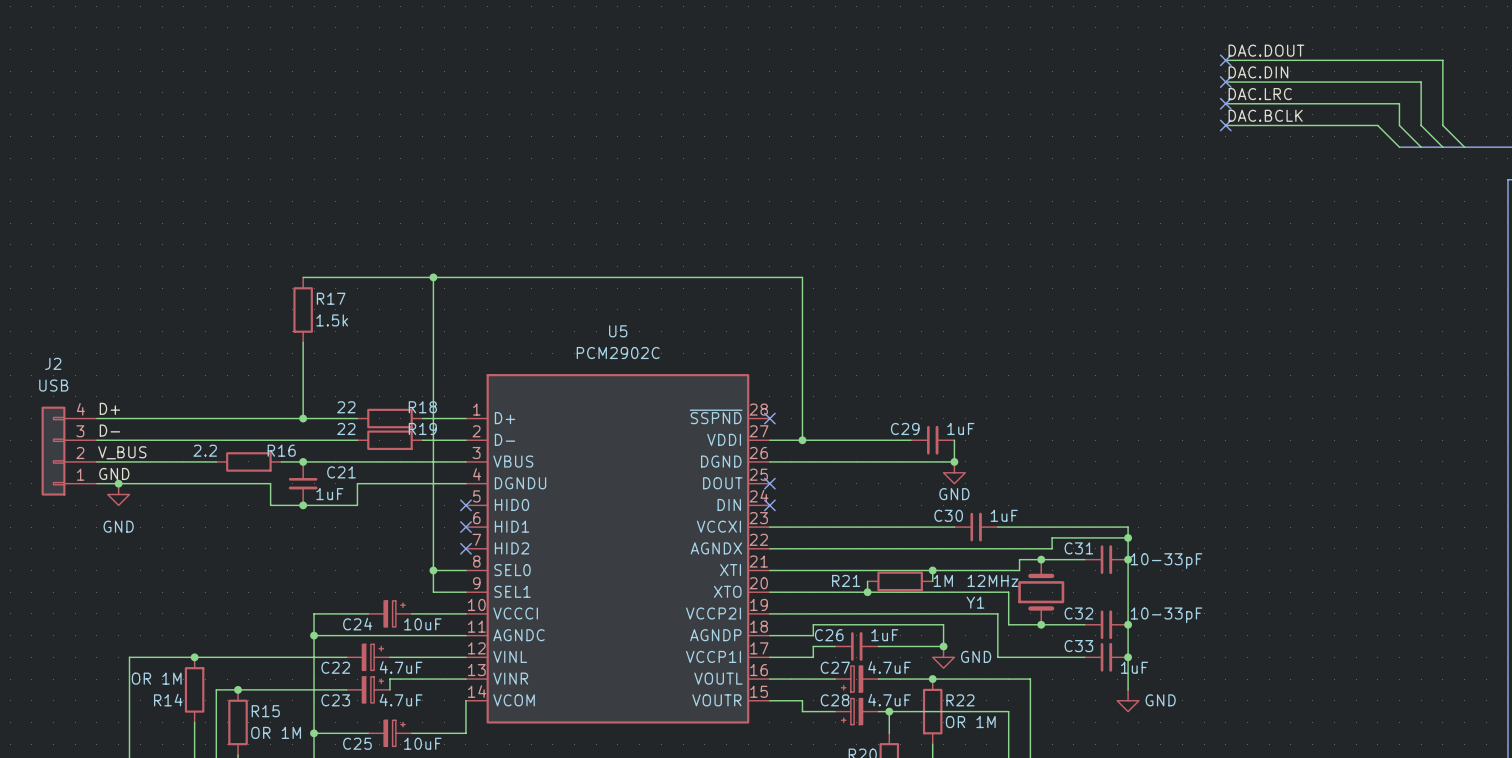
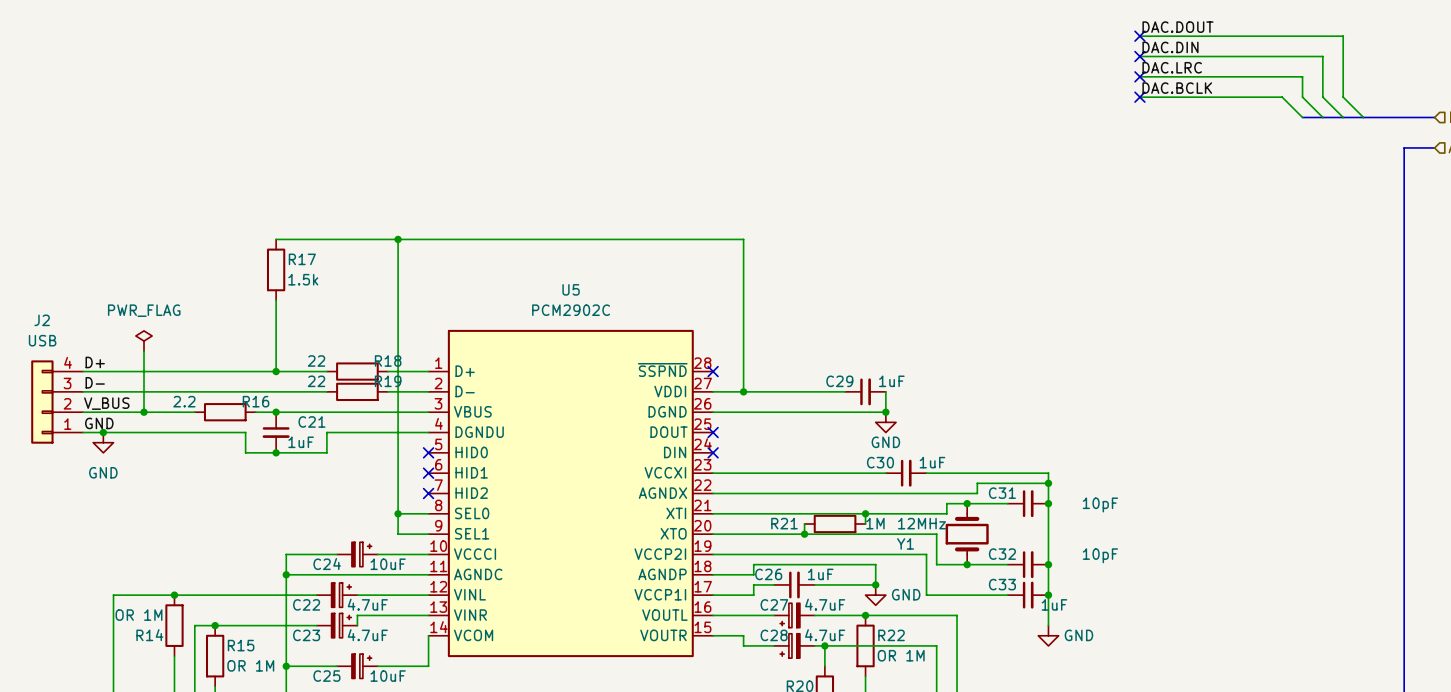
power symbol: none -> PWR_FLAG (144, 341)
wire: none -> (144, 351) (144, 412)
junction: none -> (144, 412)
C31 value: 10-33pF (1166, 561) -> 10pF (1100, 504)
C32 value: 10-33pF (1166, 615) -> 10pF (1100, 555)

